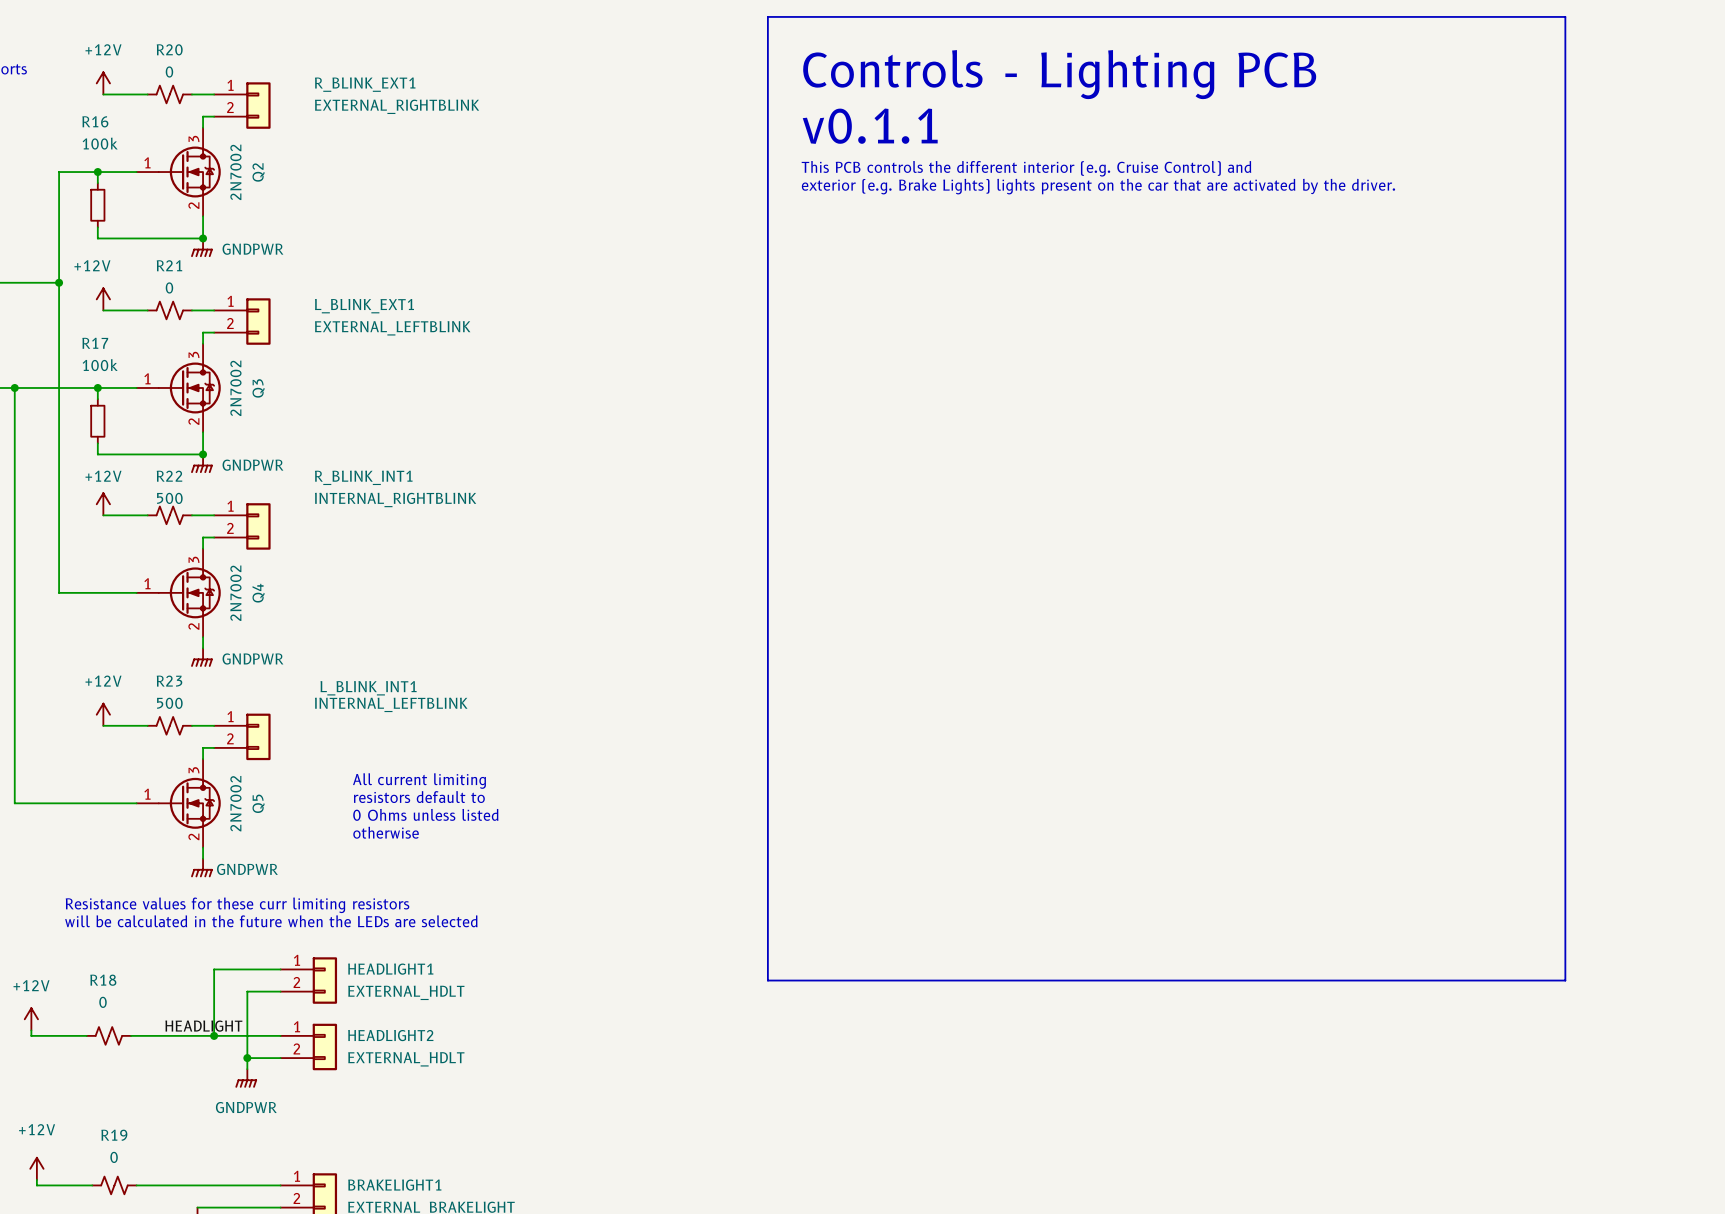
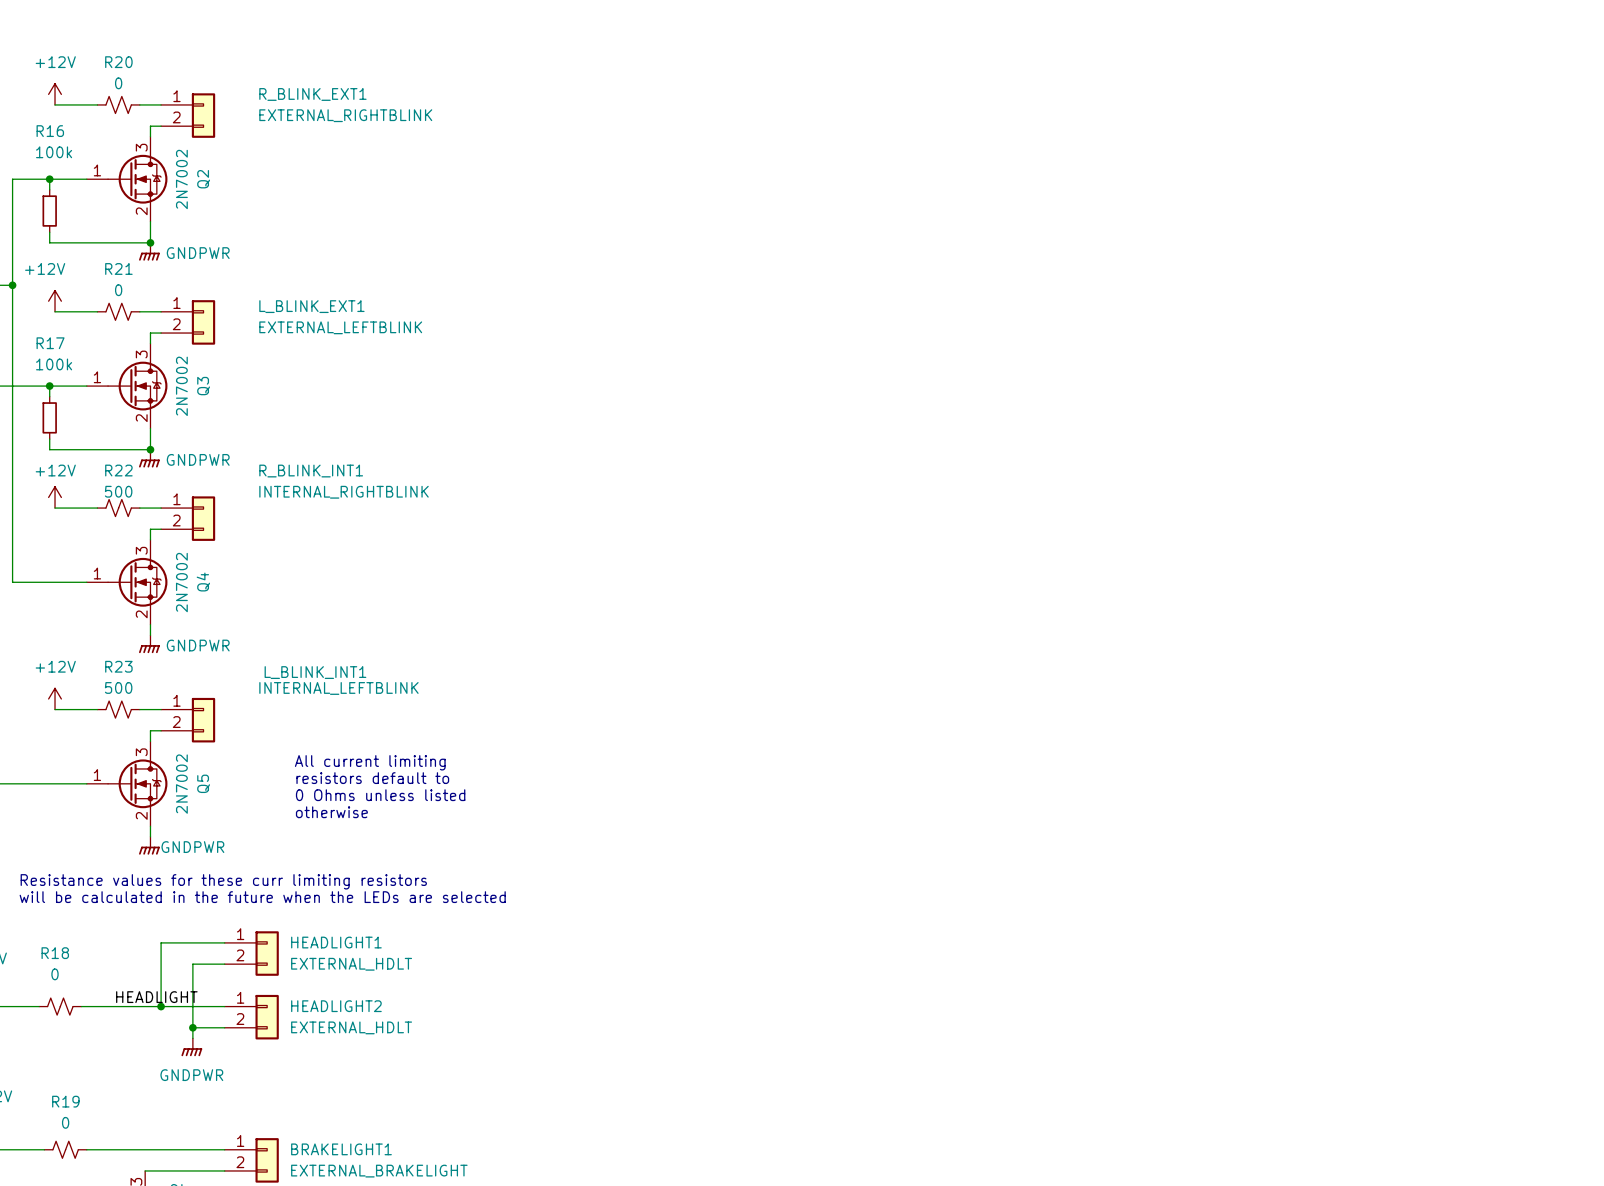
line: (767, 16) (1565, 16) (1565, 980) (767, 980) (767, 16) -> none
text: Controls - Lighting PCB (1059, 74) -> none
text: v0.1.1 (870, 126) -> none
text: This PCB controls the different interior (e.g. Cruise Control) and (1026, 168) -> none
text: exterior (e.g. Brake Lights) lights present on the car that are activated by the driver. (1098, 186) -> none

